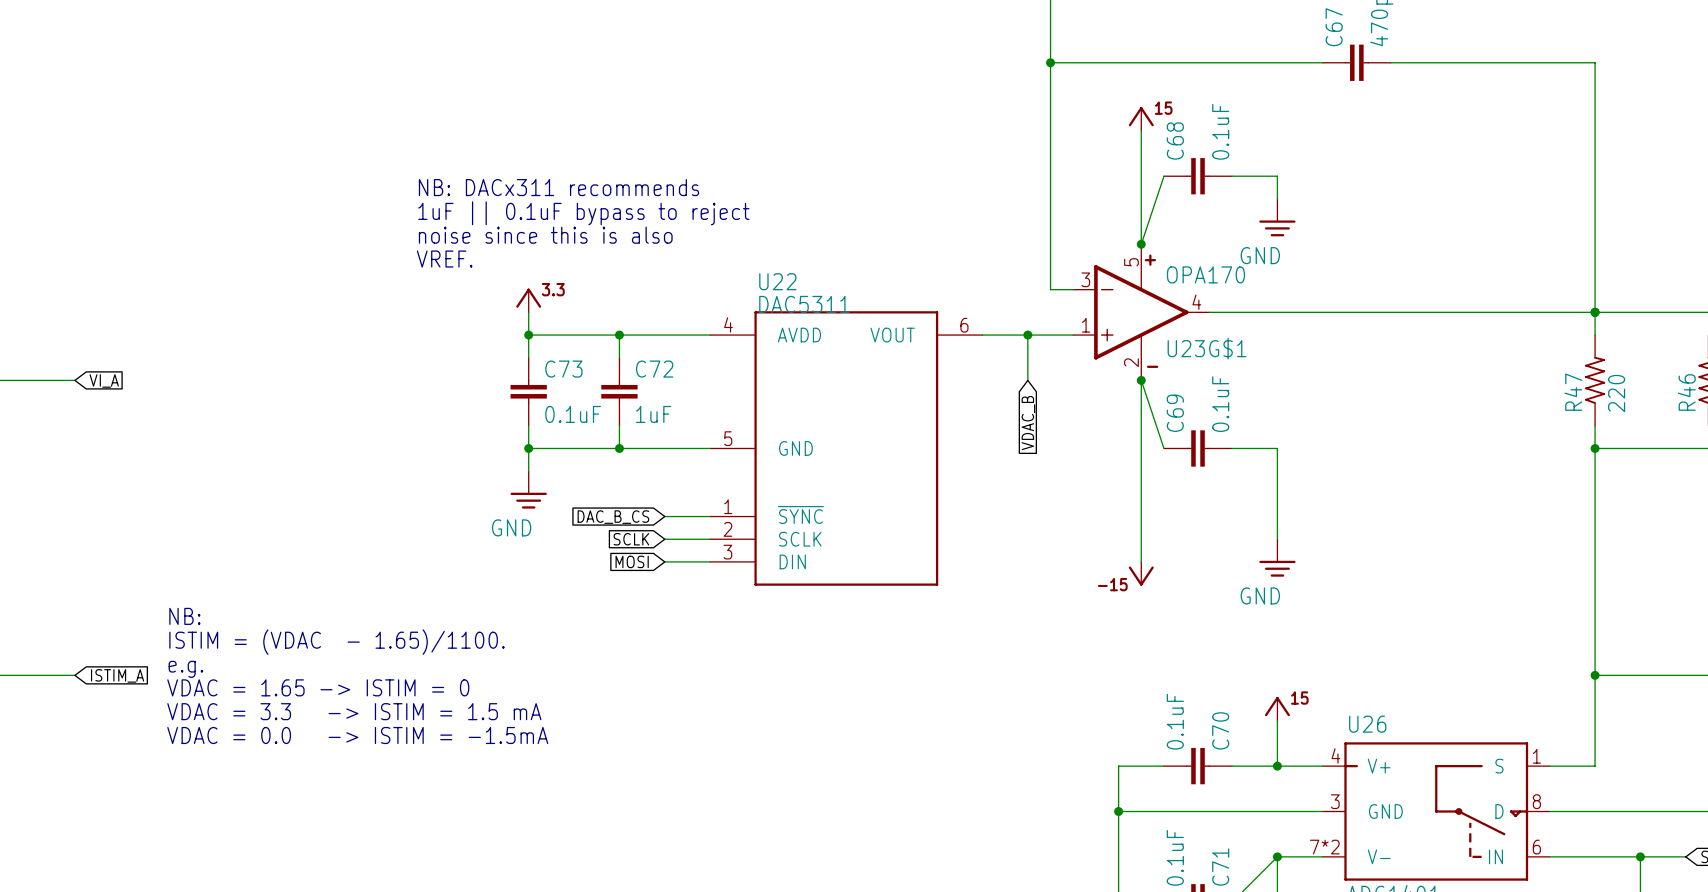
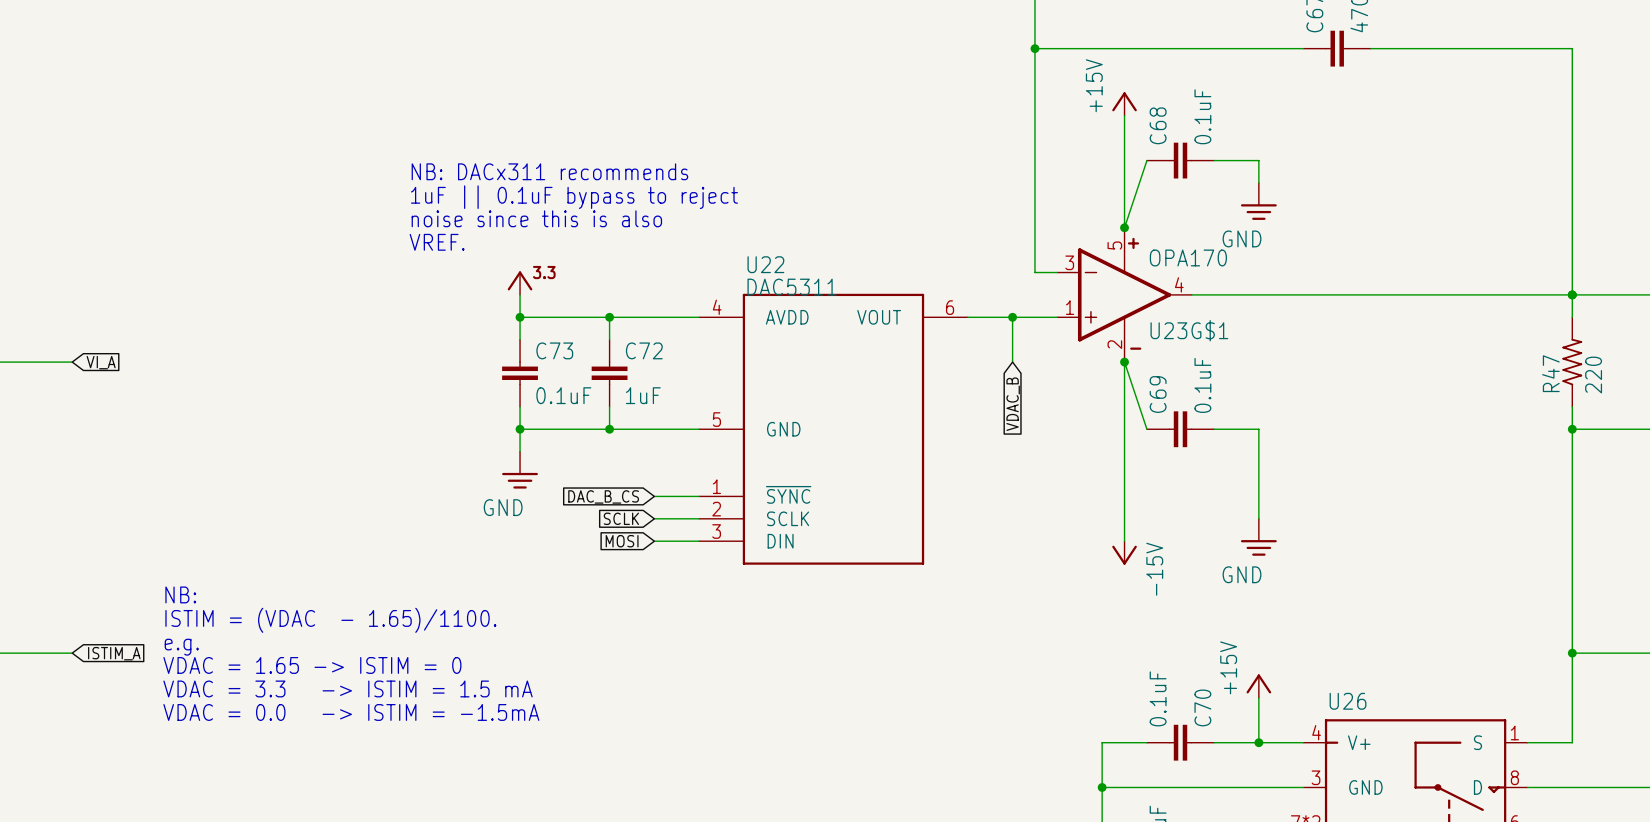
power symbol text: none -> +15V (1094, 85)
power symbol text: 15 (1163, 108) -> none
power symbol text: -15 (1112, 584) -> none
power symbol text: none -> -15V (1154, 569)
power symbol text: none -> +15V (1228, 667)
power symbol text: 15 (1299, 698) -> none

